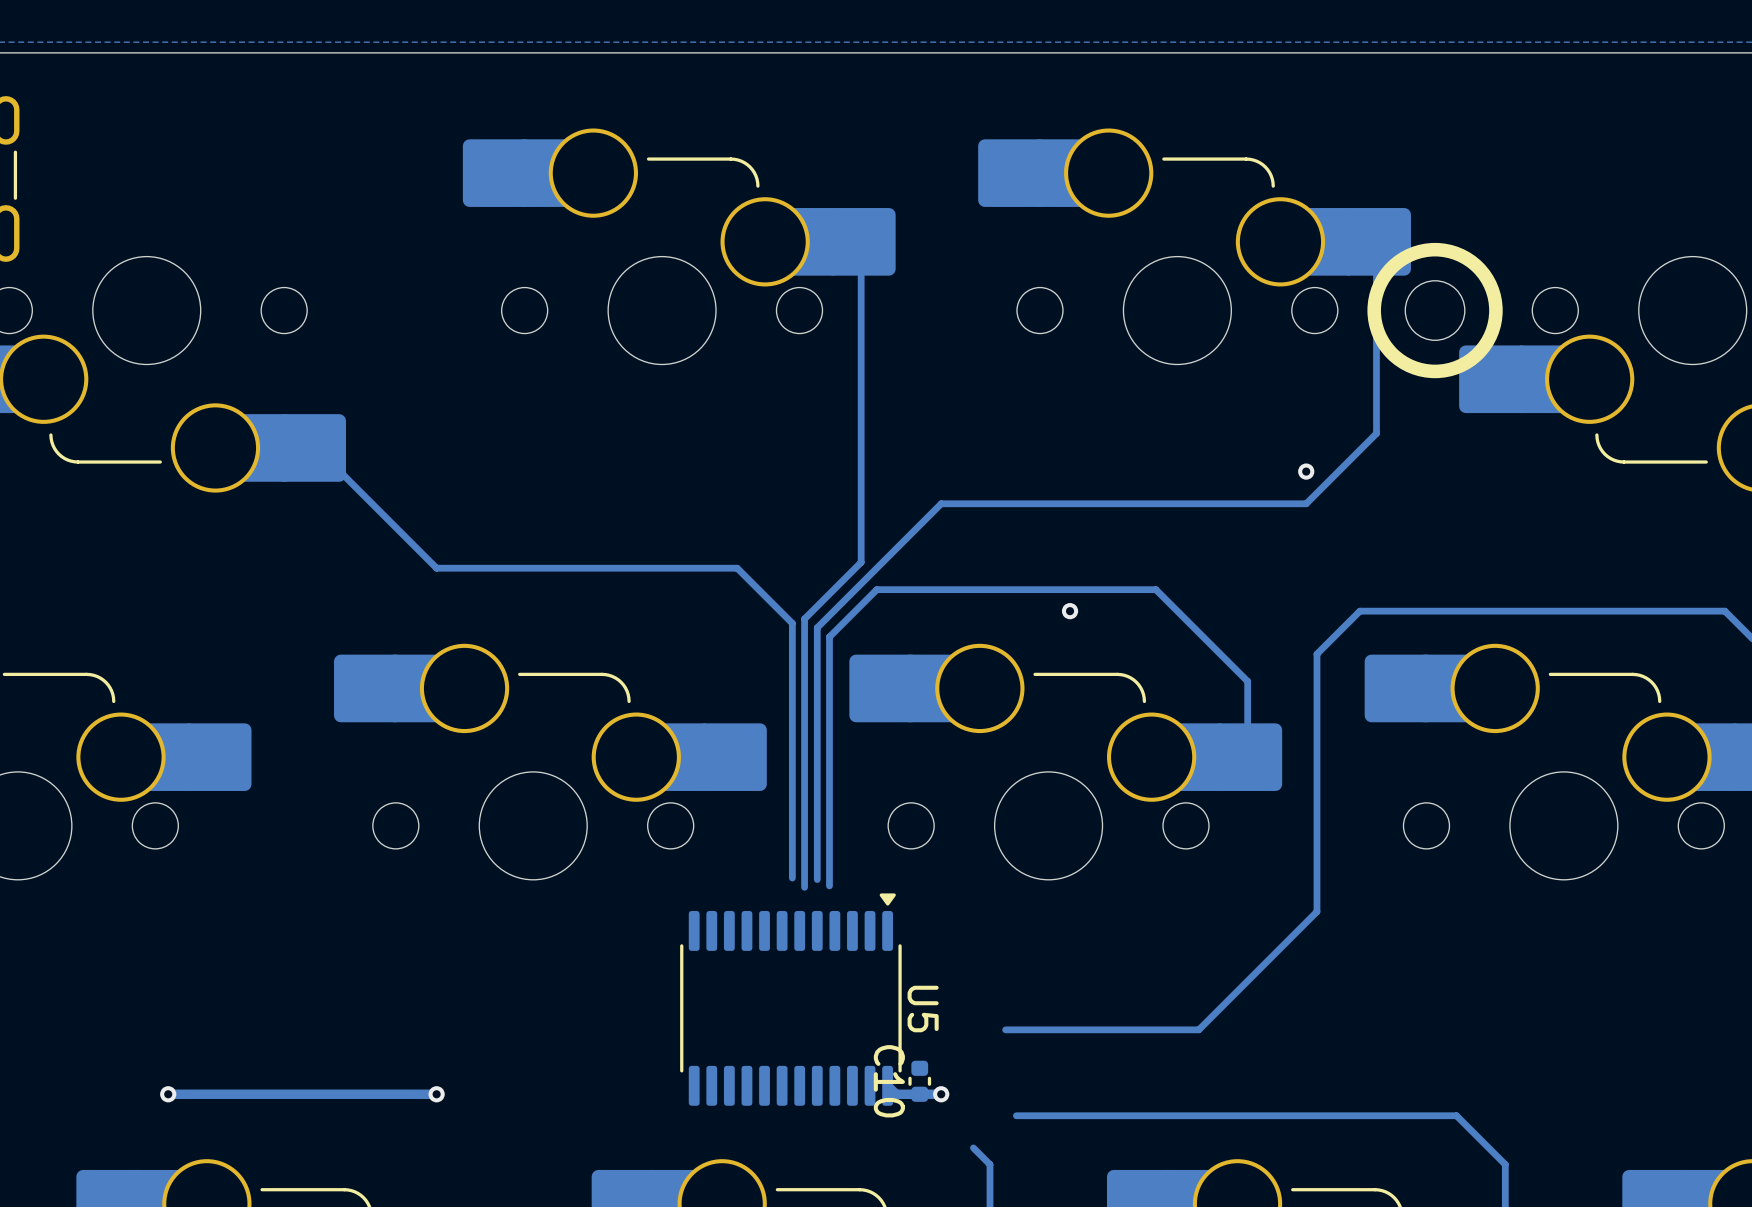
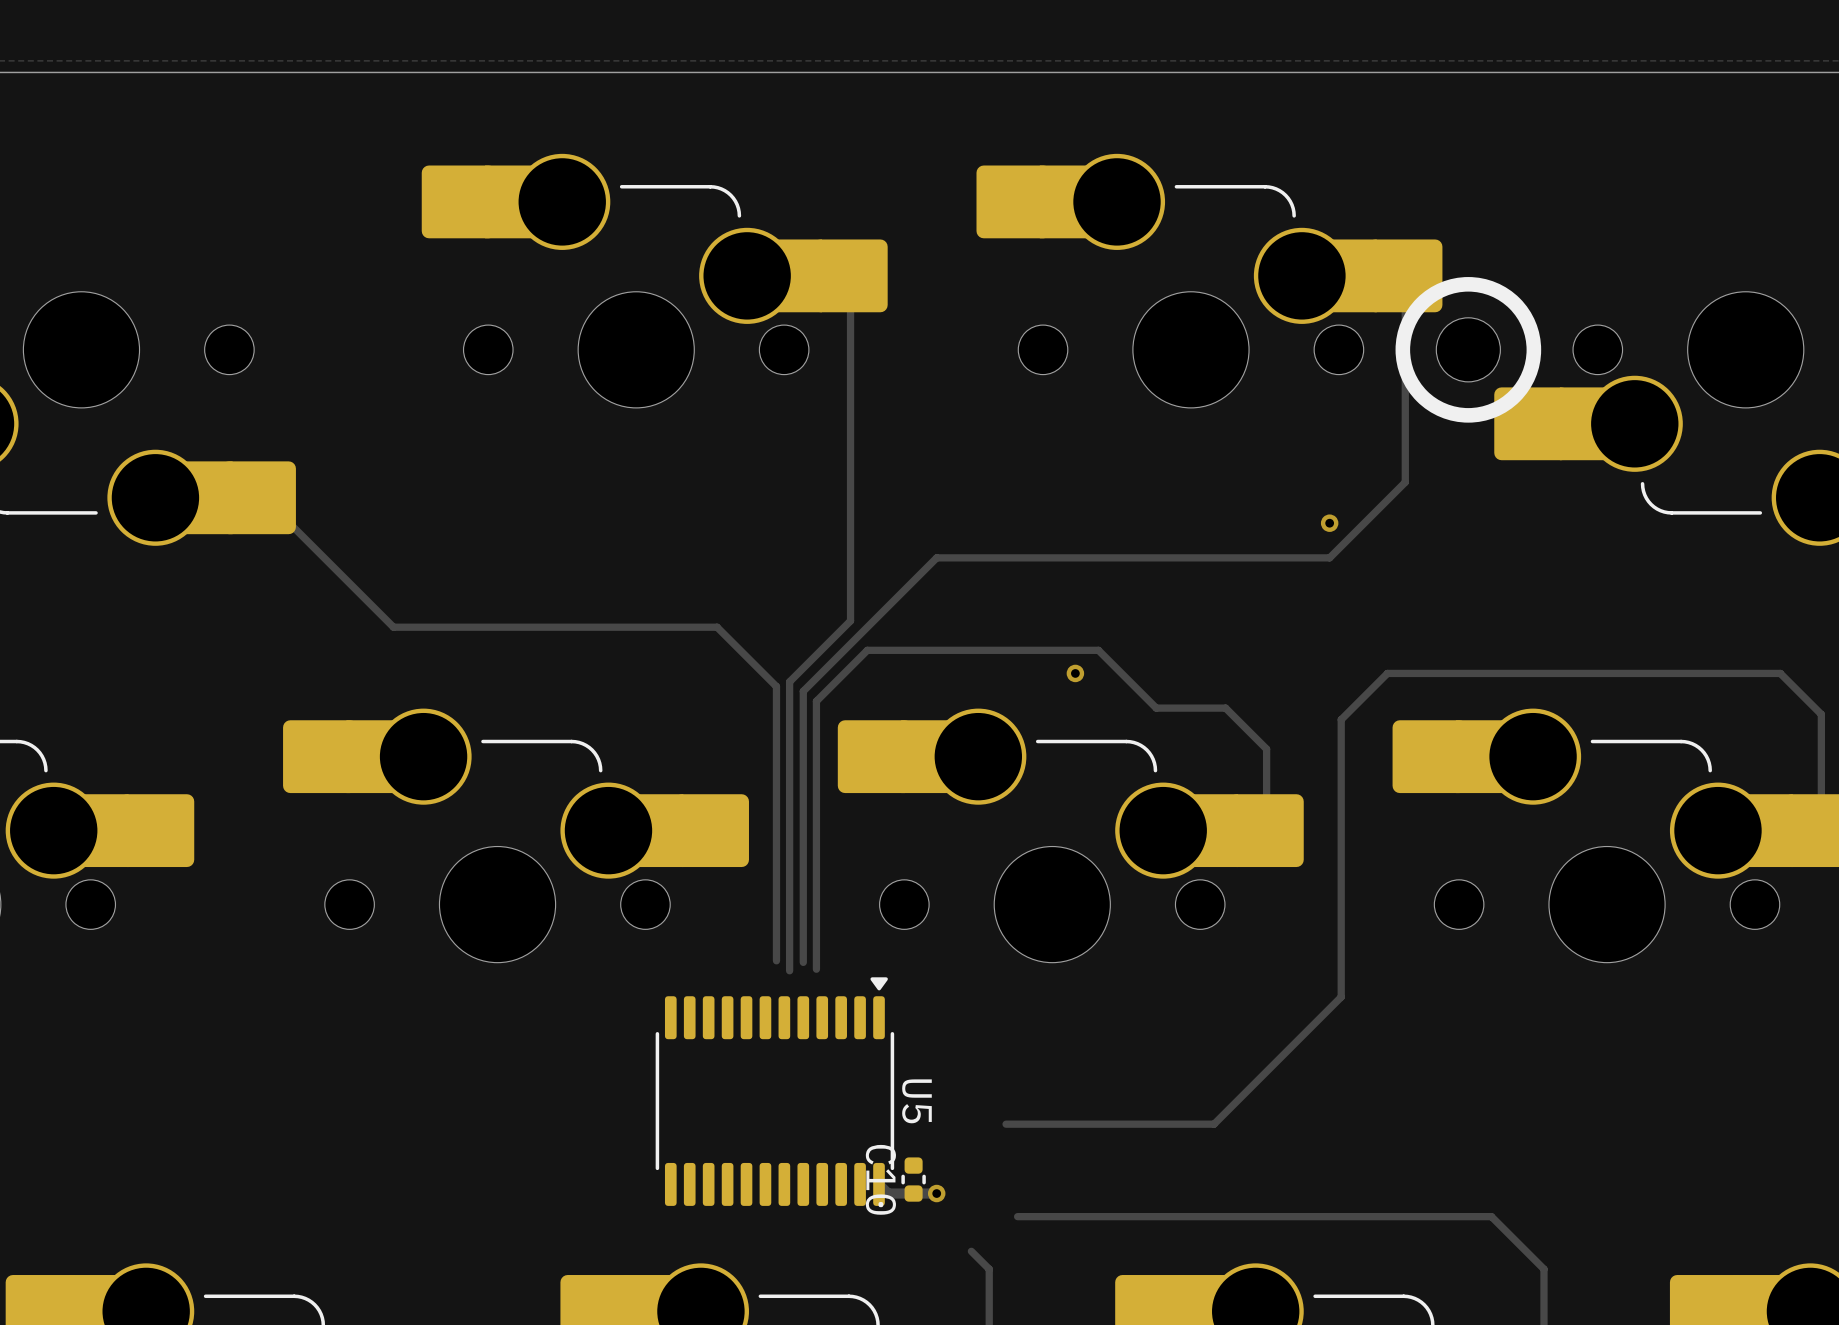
track: (1091, 589) (1155, 589) (1209, 643) -> (1098, 650) (1156, 708) (1225, 708)
via: (168, 1094) -> none
track: (436, 1094) (168, 1094) -> none
via: (436, 1094) -> none

